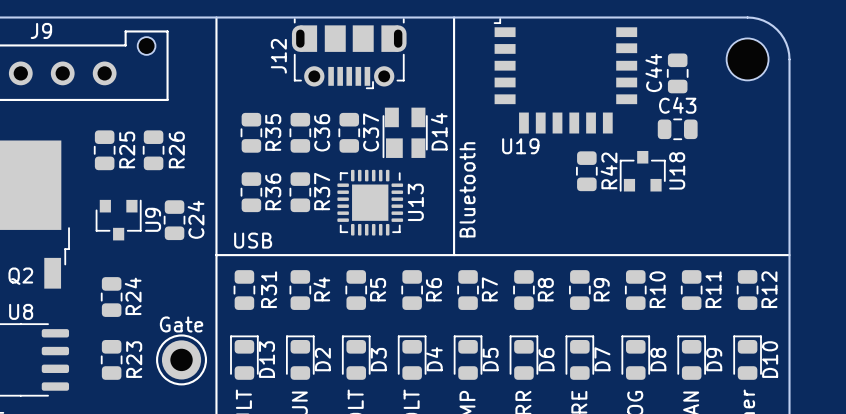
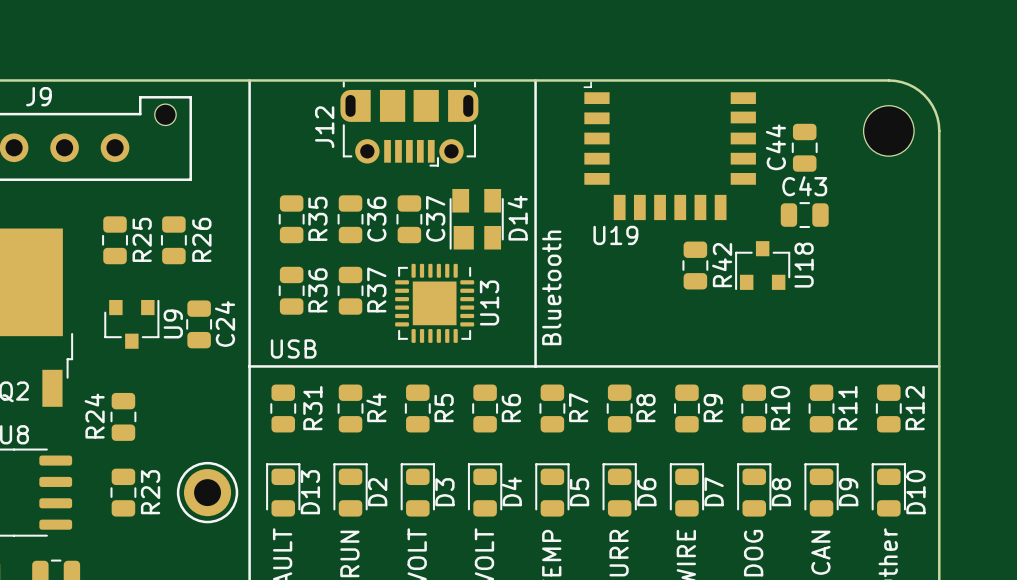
R24 name position: R24 (133, 296) -> R24 (94, 416)
text: Gate (181, 324) -> none

